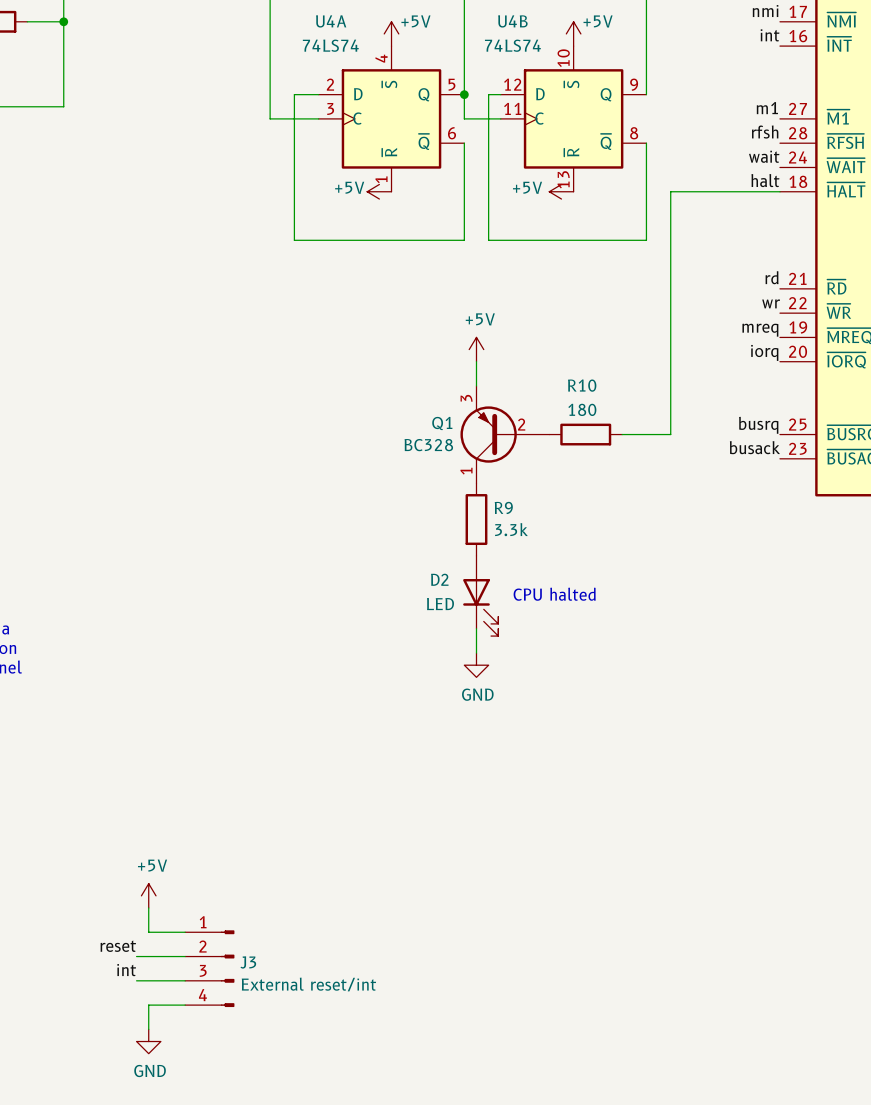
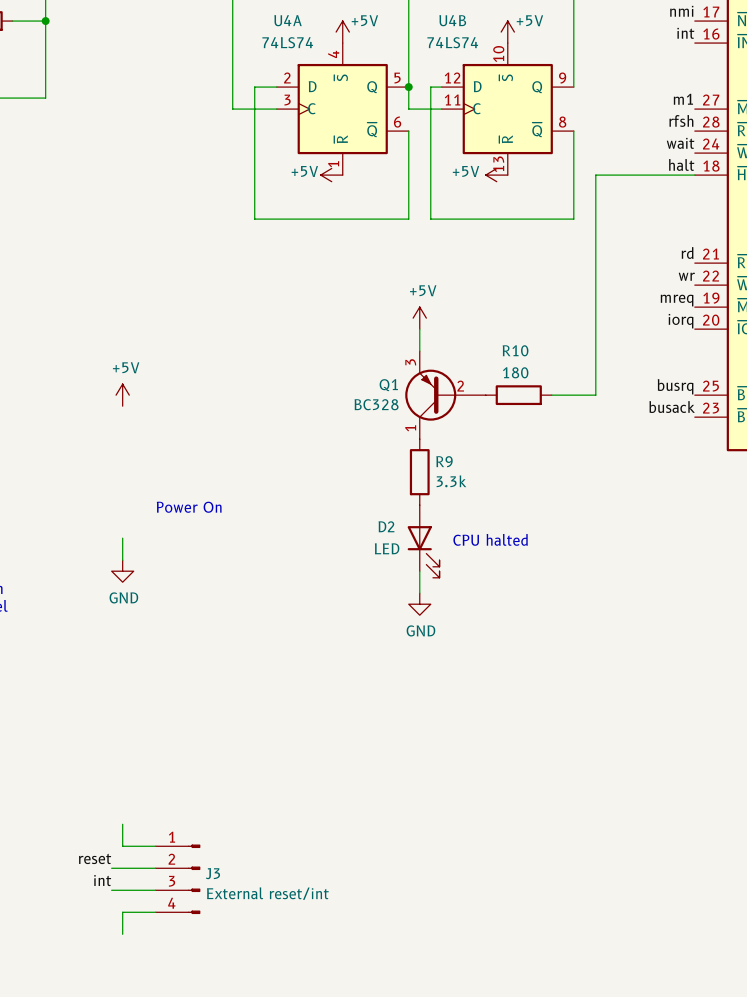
power symbol: none -> +5V (122, 395)
text: none -> Power On (189, 507)
wire: none -> (122, 538) (122, 560)
power symbol: none -> GND (122, 571)
power symbol: +5V (148, 895) -> none
power symbol: GND (148, 1041) -> none

